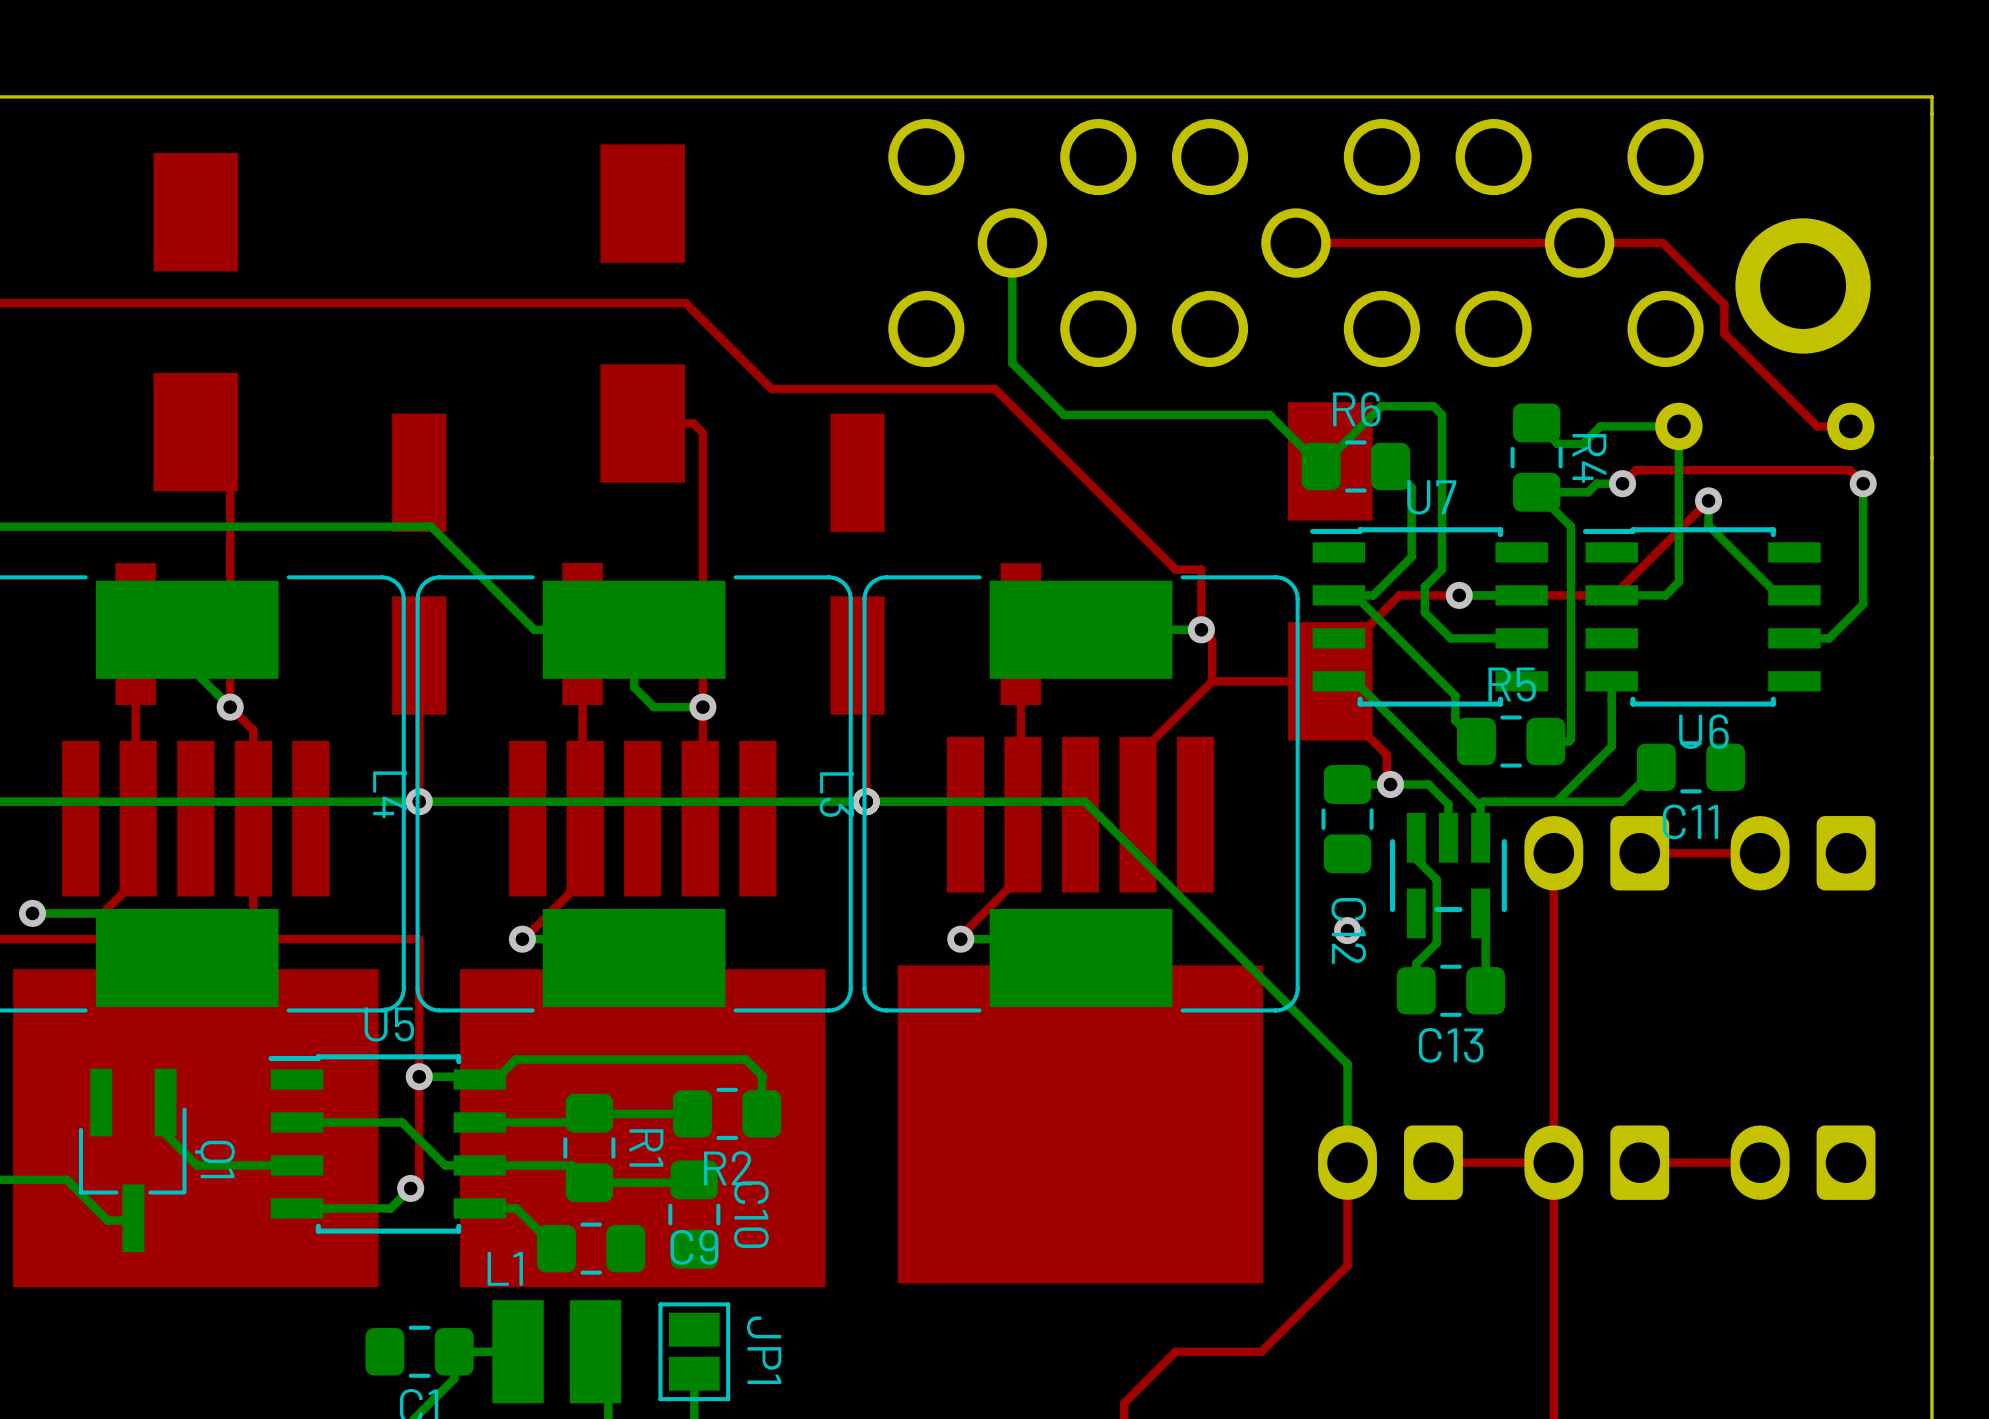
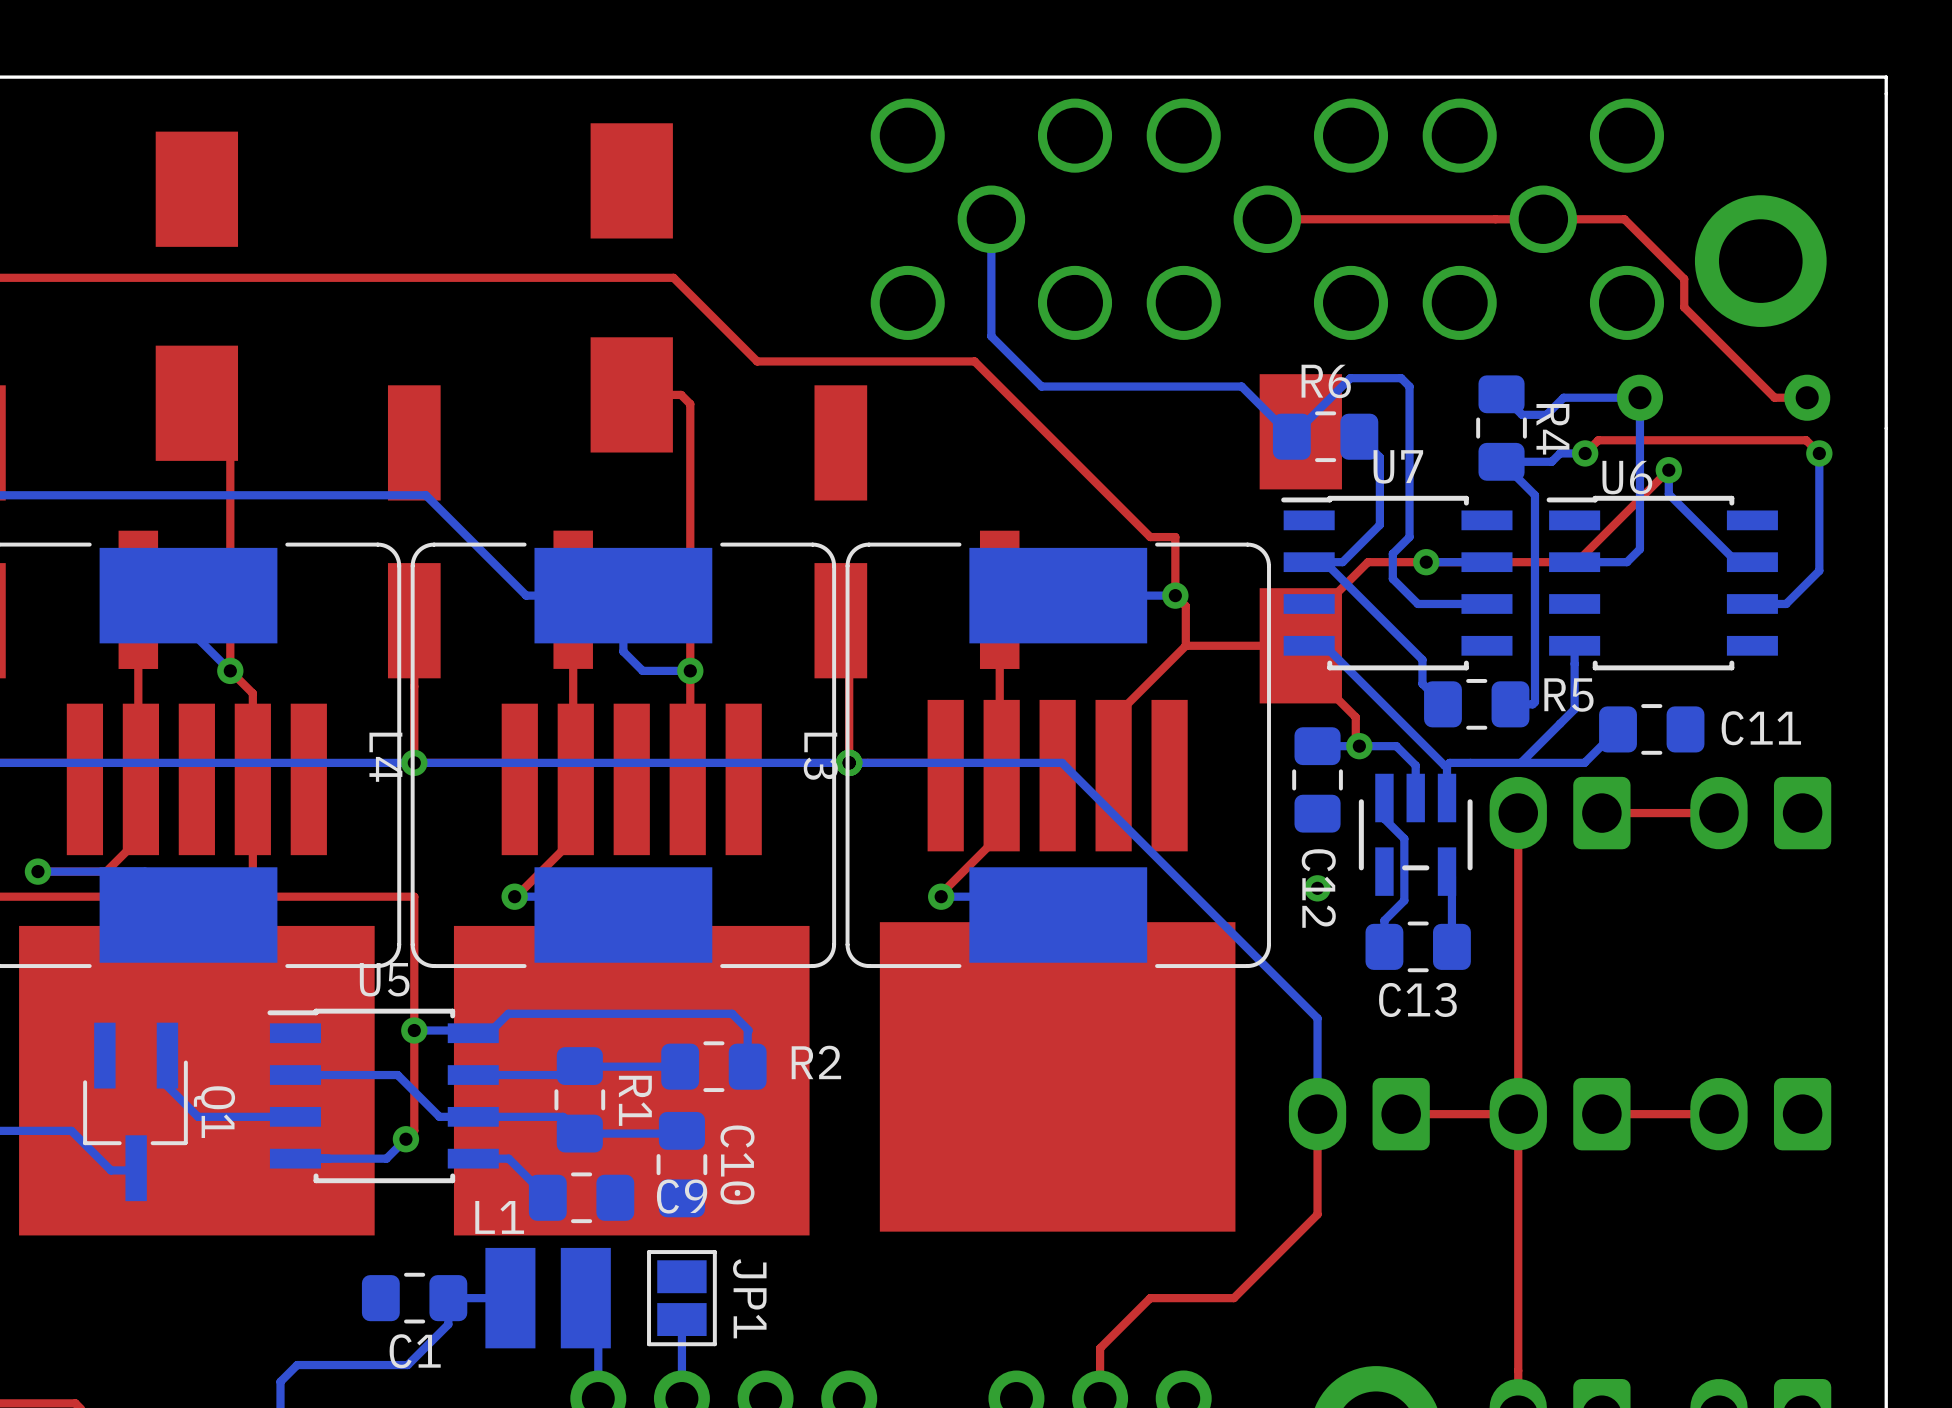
R5 name position: R5 (1512, 684) -> R5 (1568, 695)
U6 name position: U6 (1703, 731) -> U6 (1627, 477)
C11 name position: C11 (1690, 821) -> C11 (1761, 728)
R2 name position: R2 (728, 1168) -> R2 (816, 1062)

